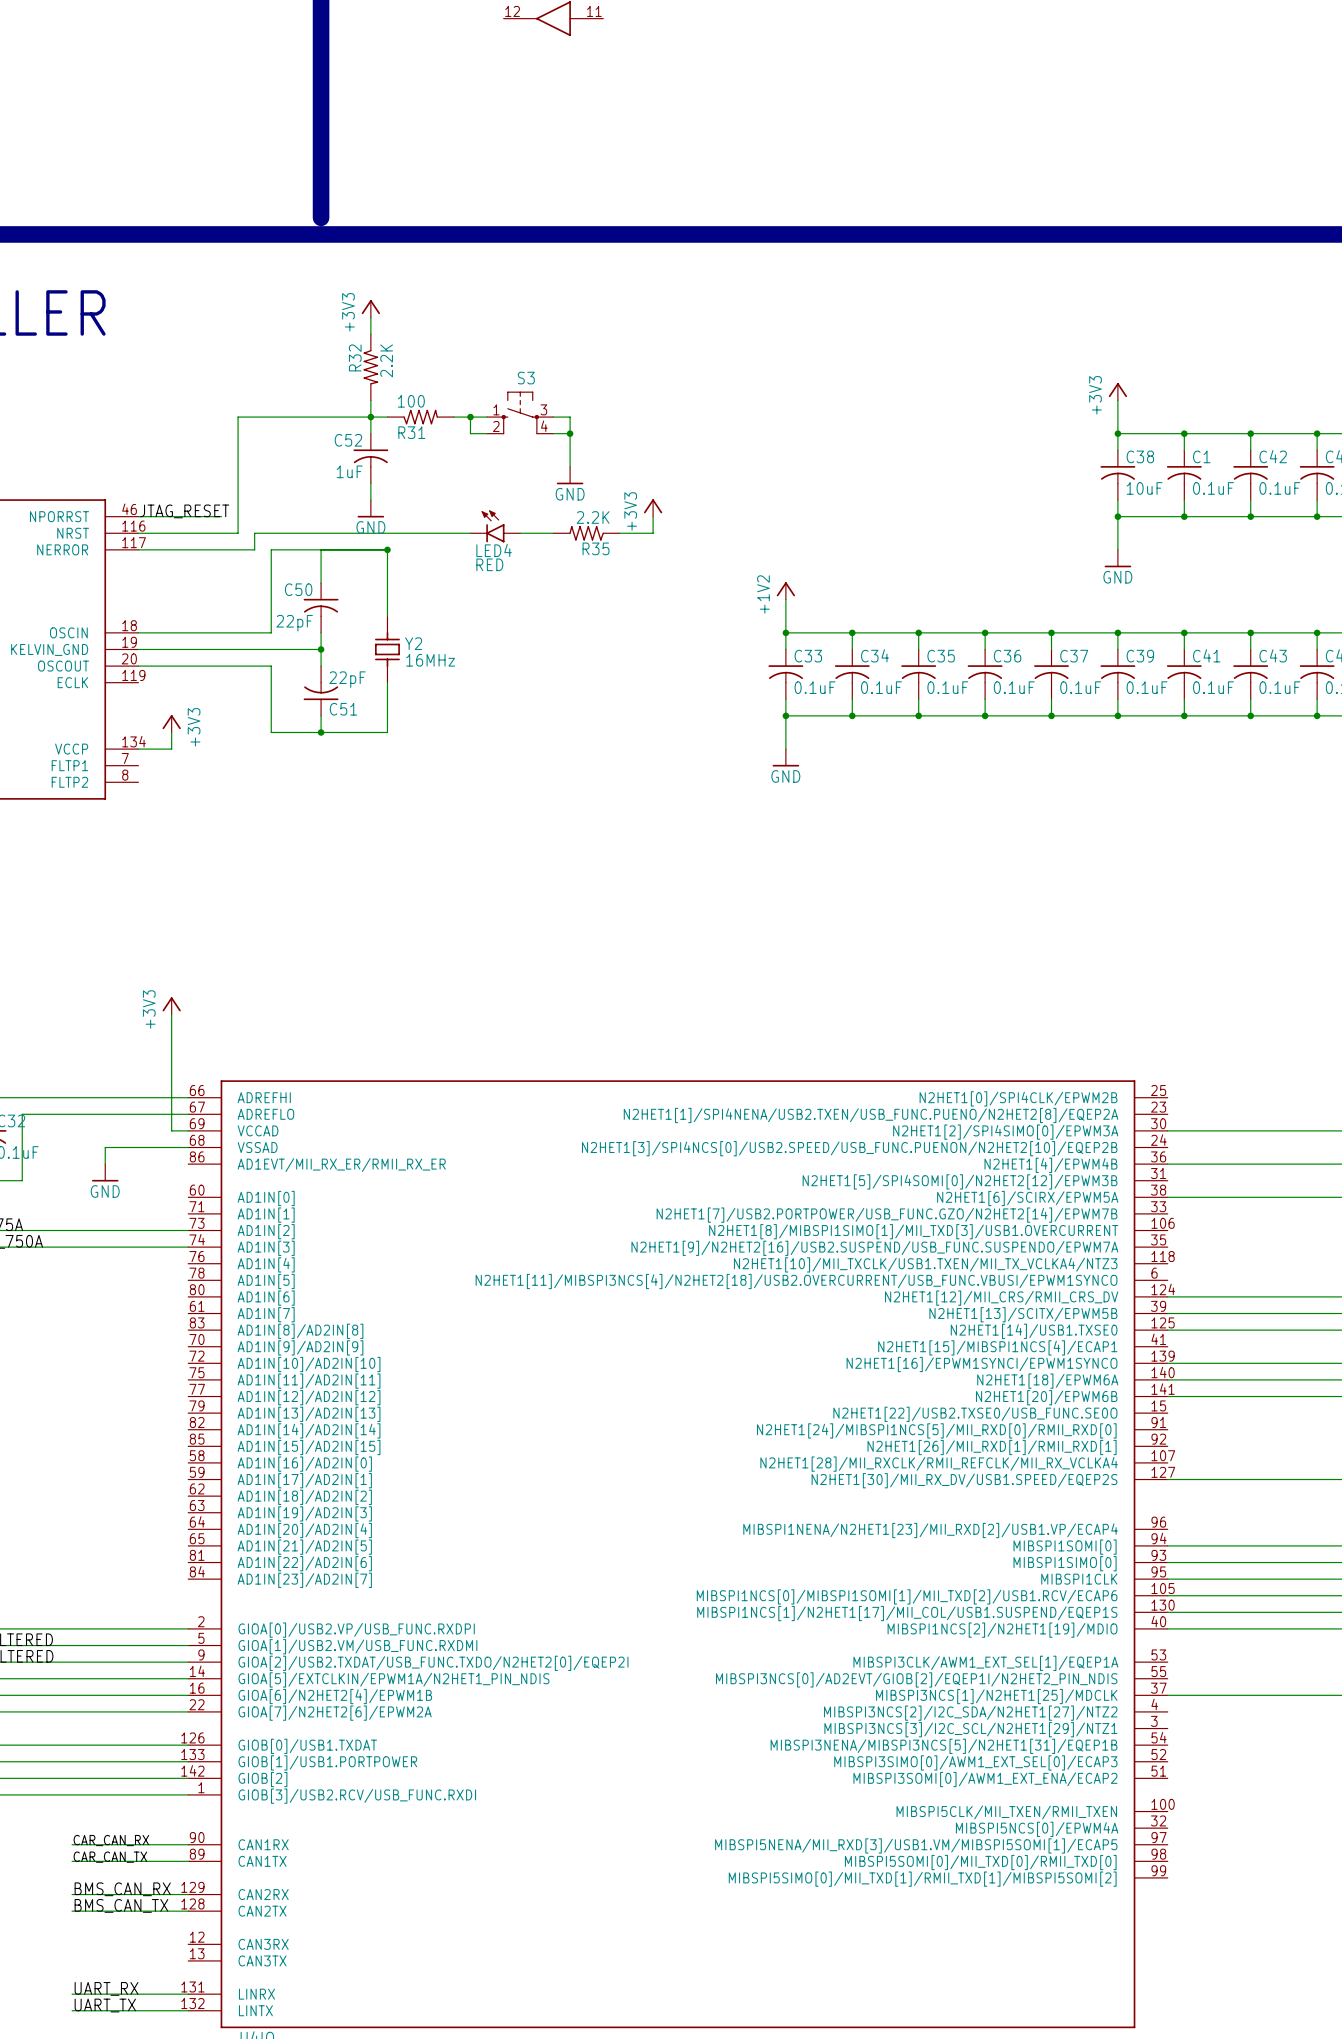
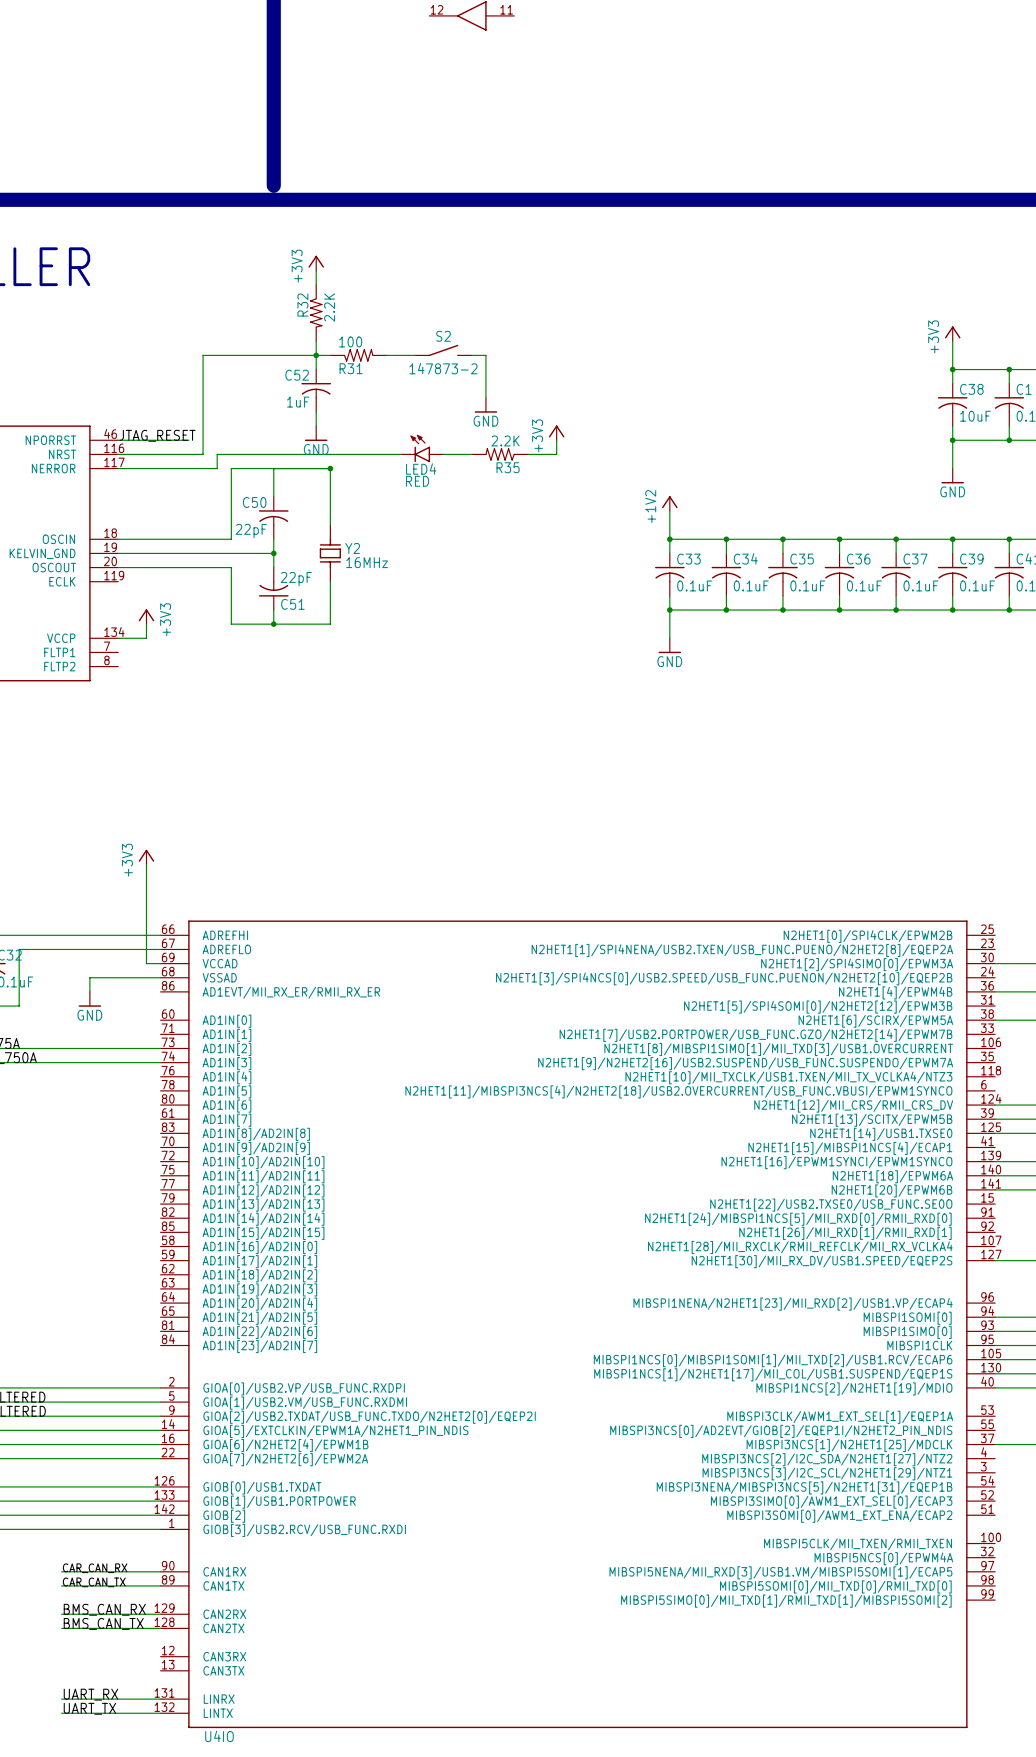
S2: none -> 147873-2 (443, 350)
S3: (520, 412) -> none
wire: (470, 417) (470, 433) (487, 433) -> none
junction: (470, 417) -> none
wire: (553, 433) (570, 433) -> none
junction: (570, 433) -> none

